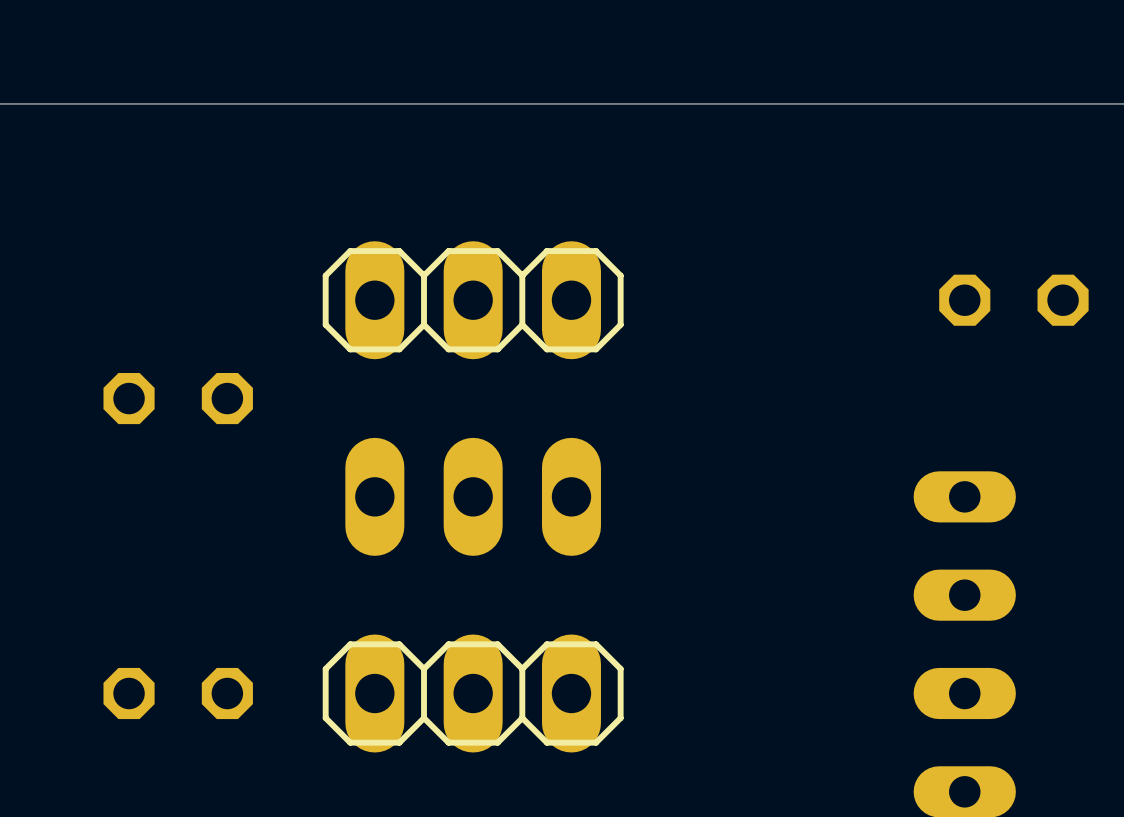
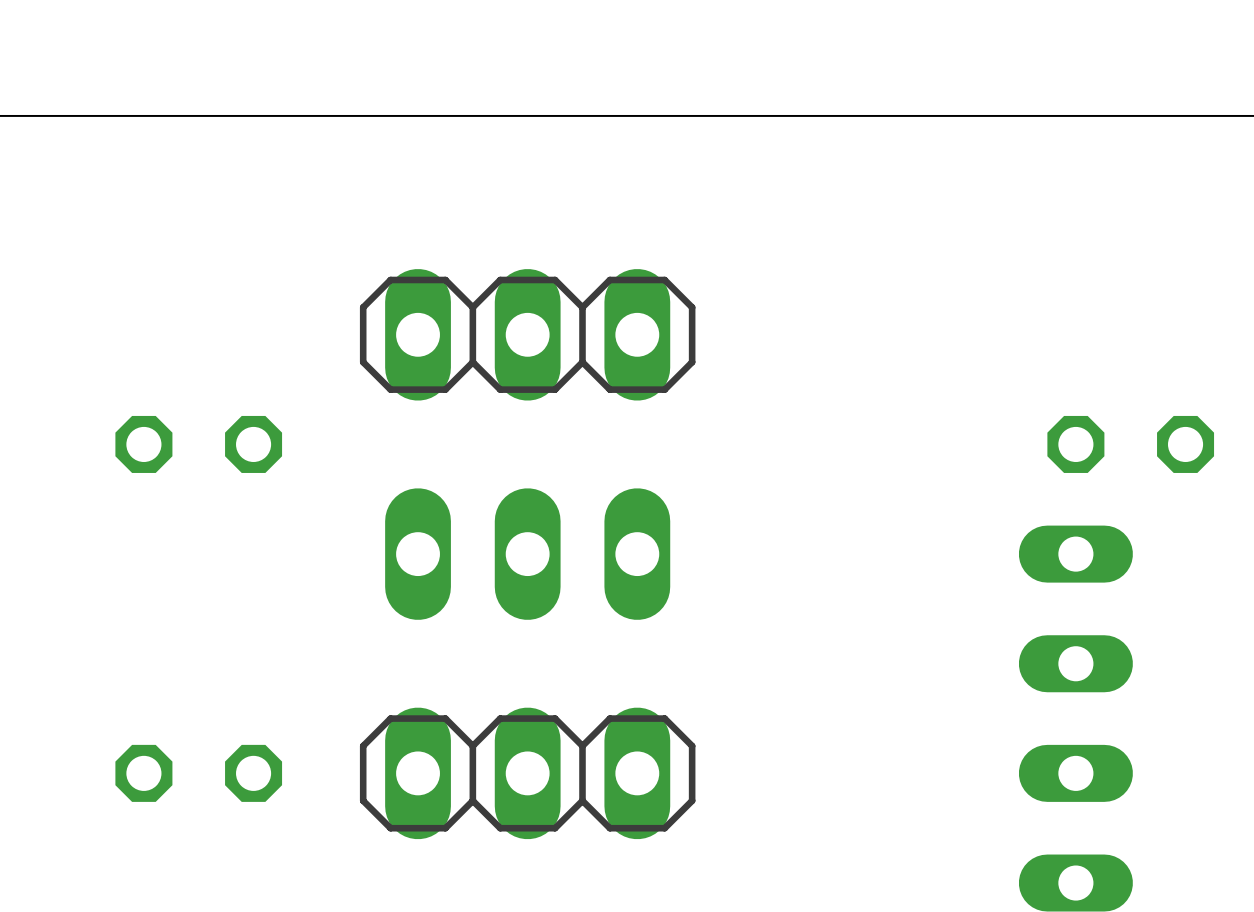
part position: (1013, 300) -> (1130, 444)

